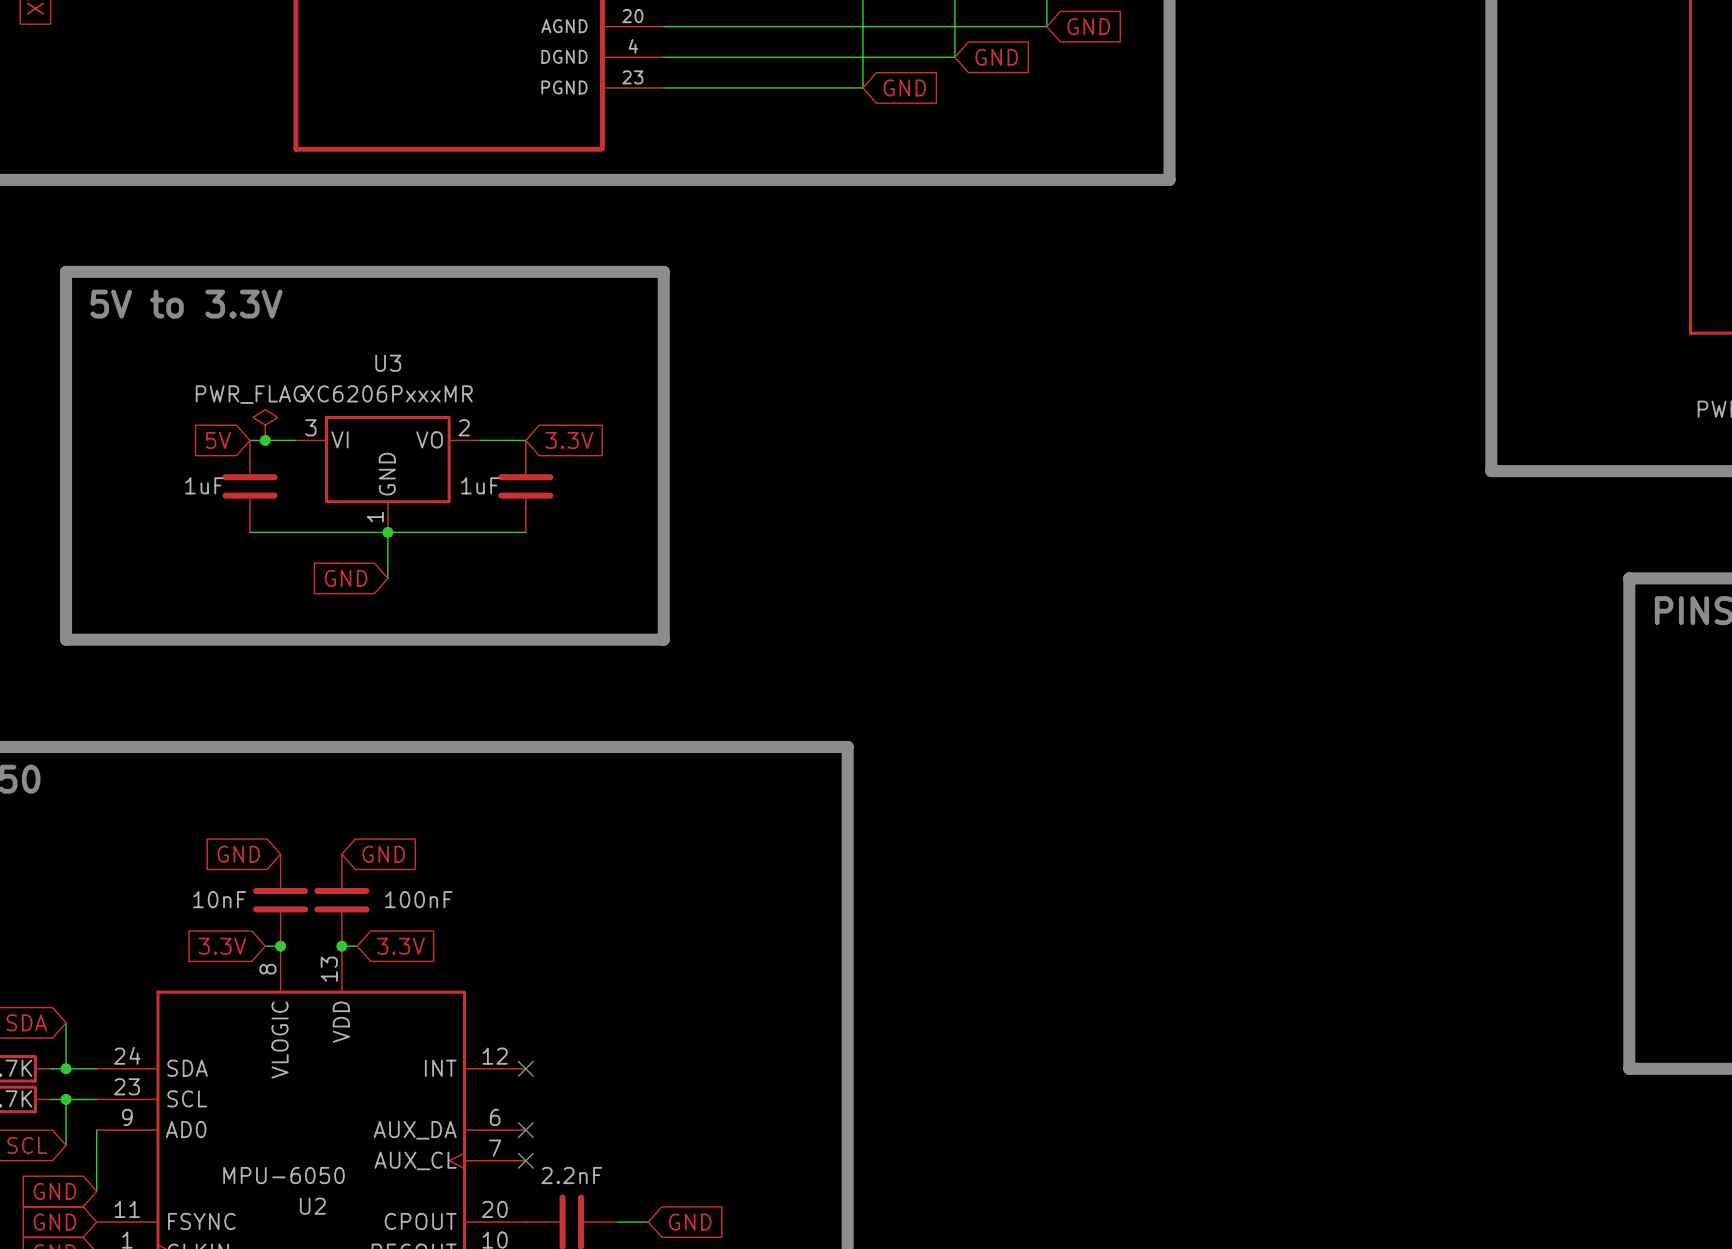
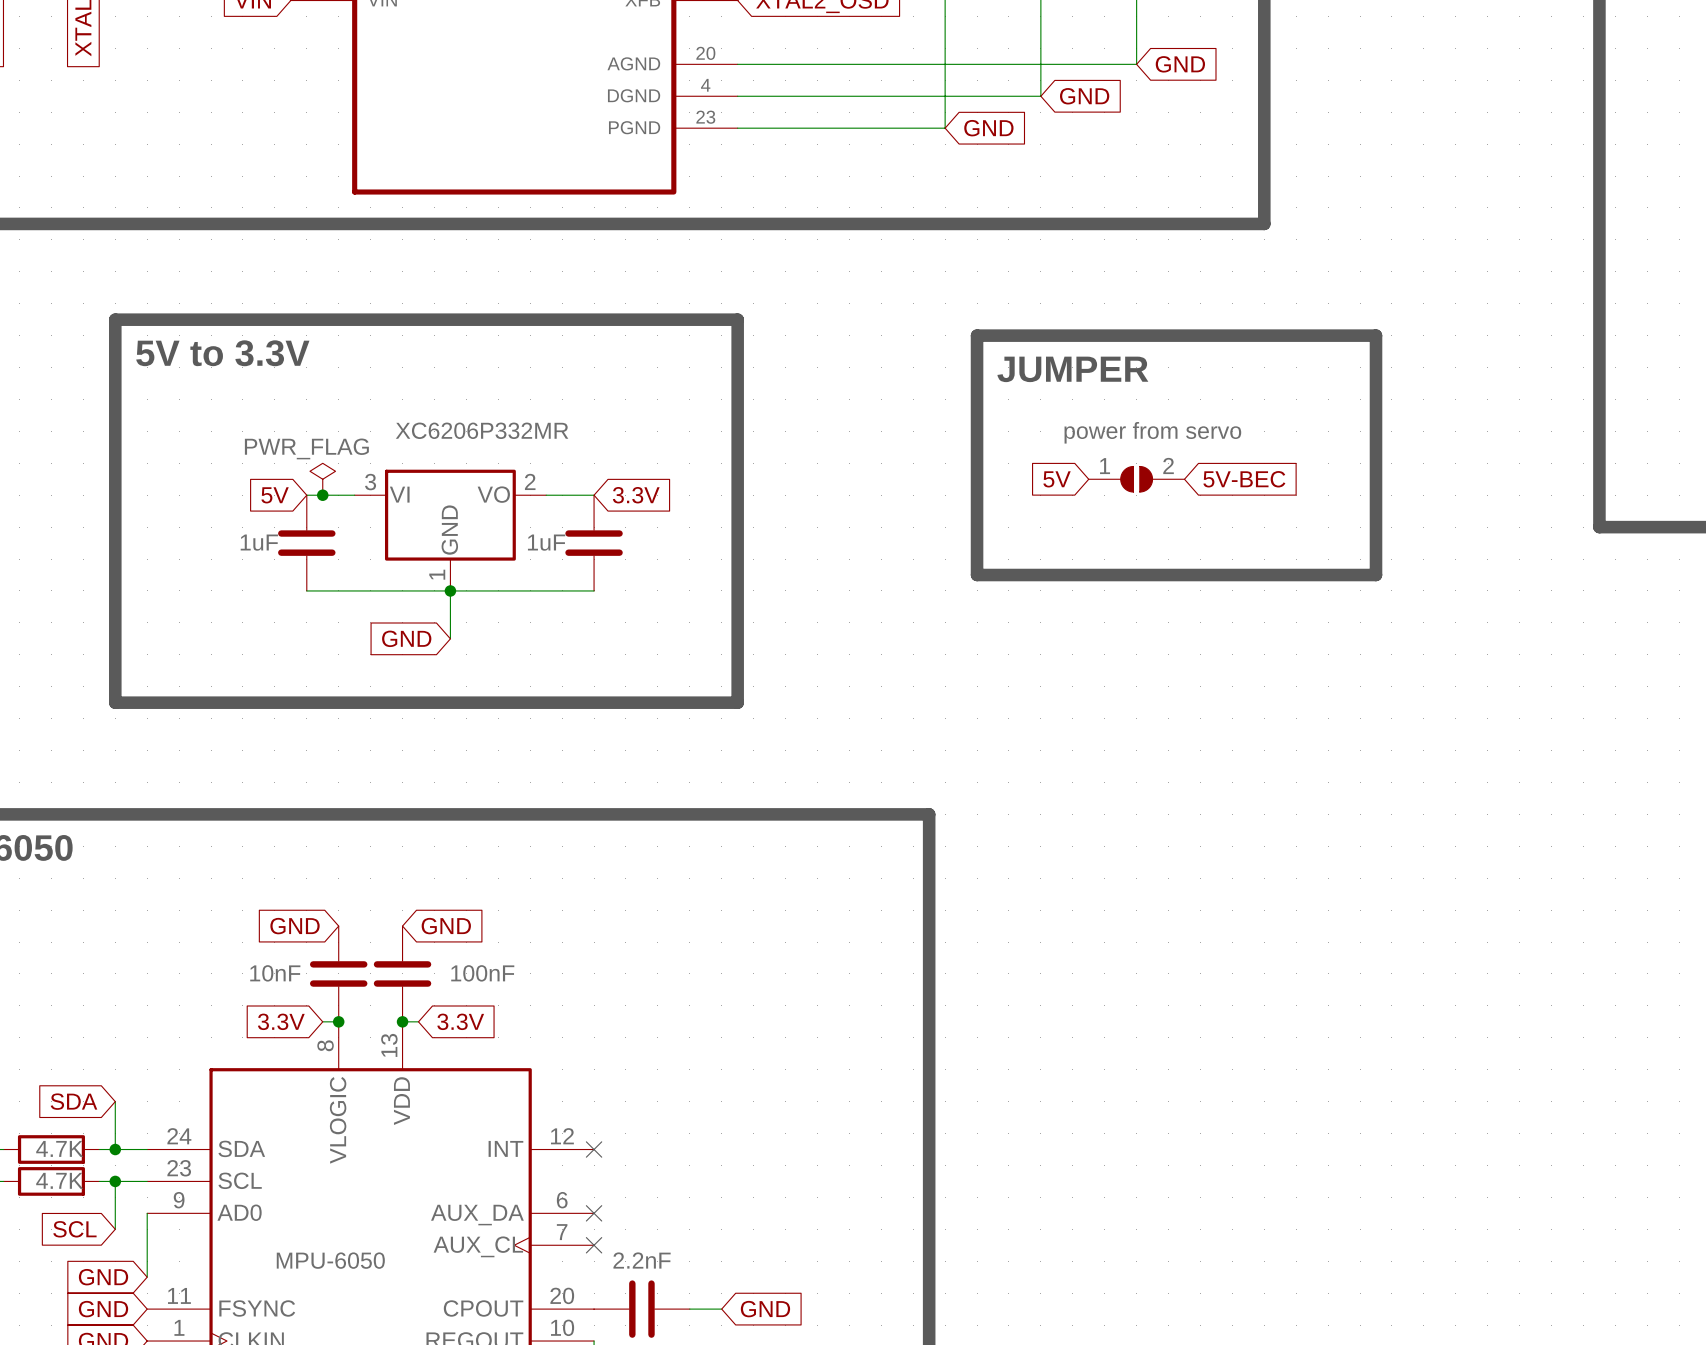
line: none -> (977, 335) (1376, 335) (1376, 575) (977, 575) (977, 335)
text: none -> JUMPER (1072, 369)
U3 name: U3 (388, 363) -> none
U3 value: XC6206PxxxMR (387, 393) -> XC6206P332MR (482, 430)
global label: none -> 5V (1057, 479)
part: none -> power from servo (1136, 479)
global label: none -> 5V-BEC (1244, 479)
U2 name: U2 (312, 1206) -> none

